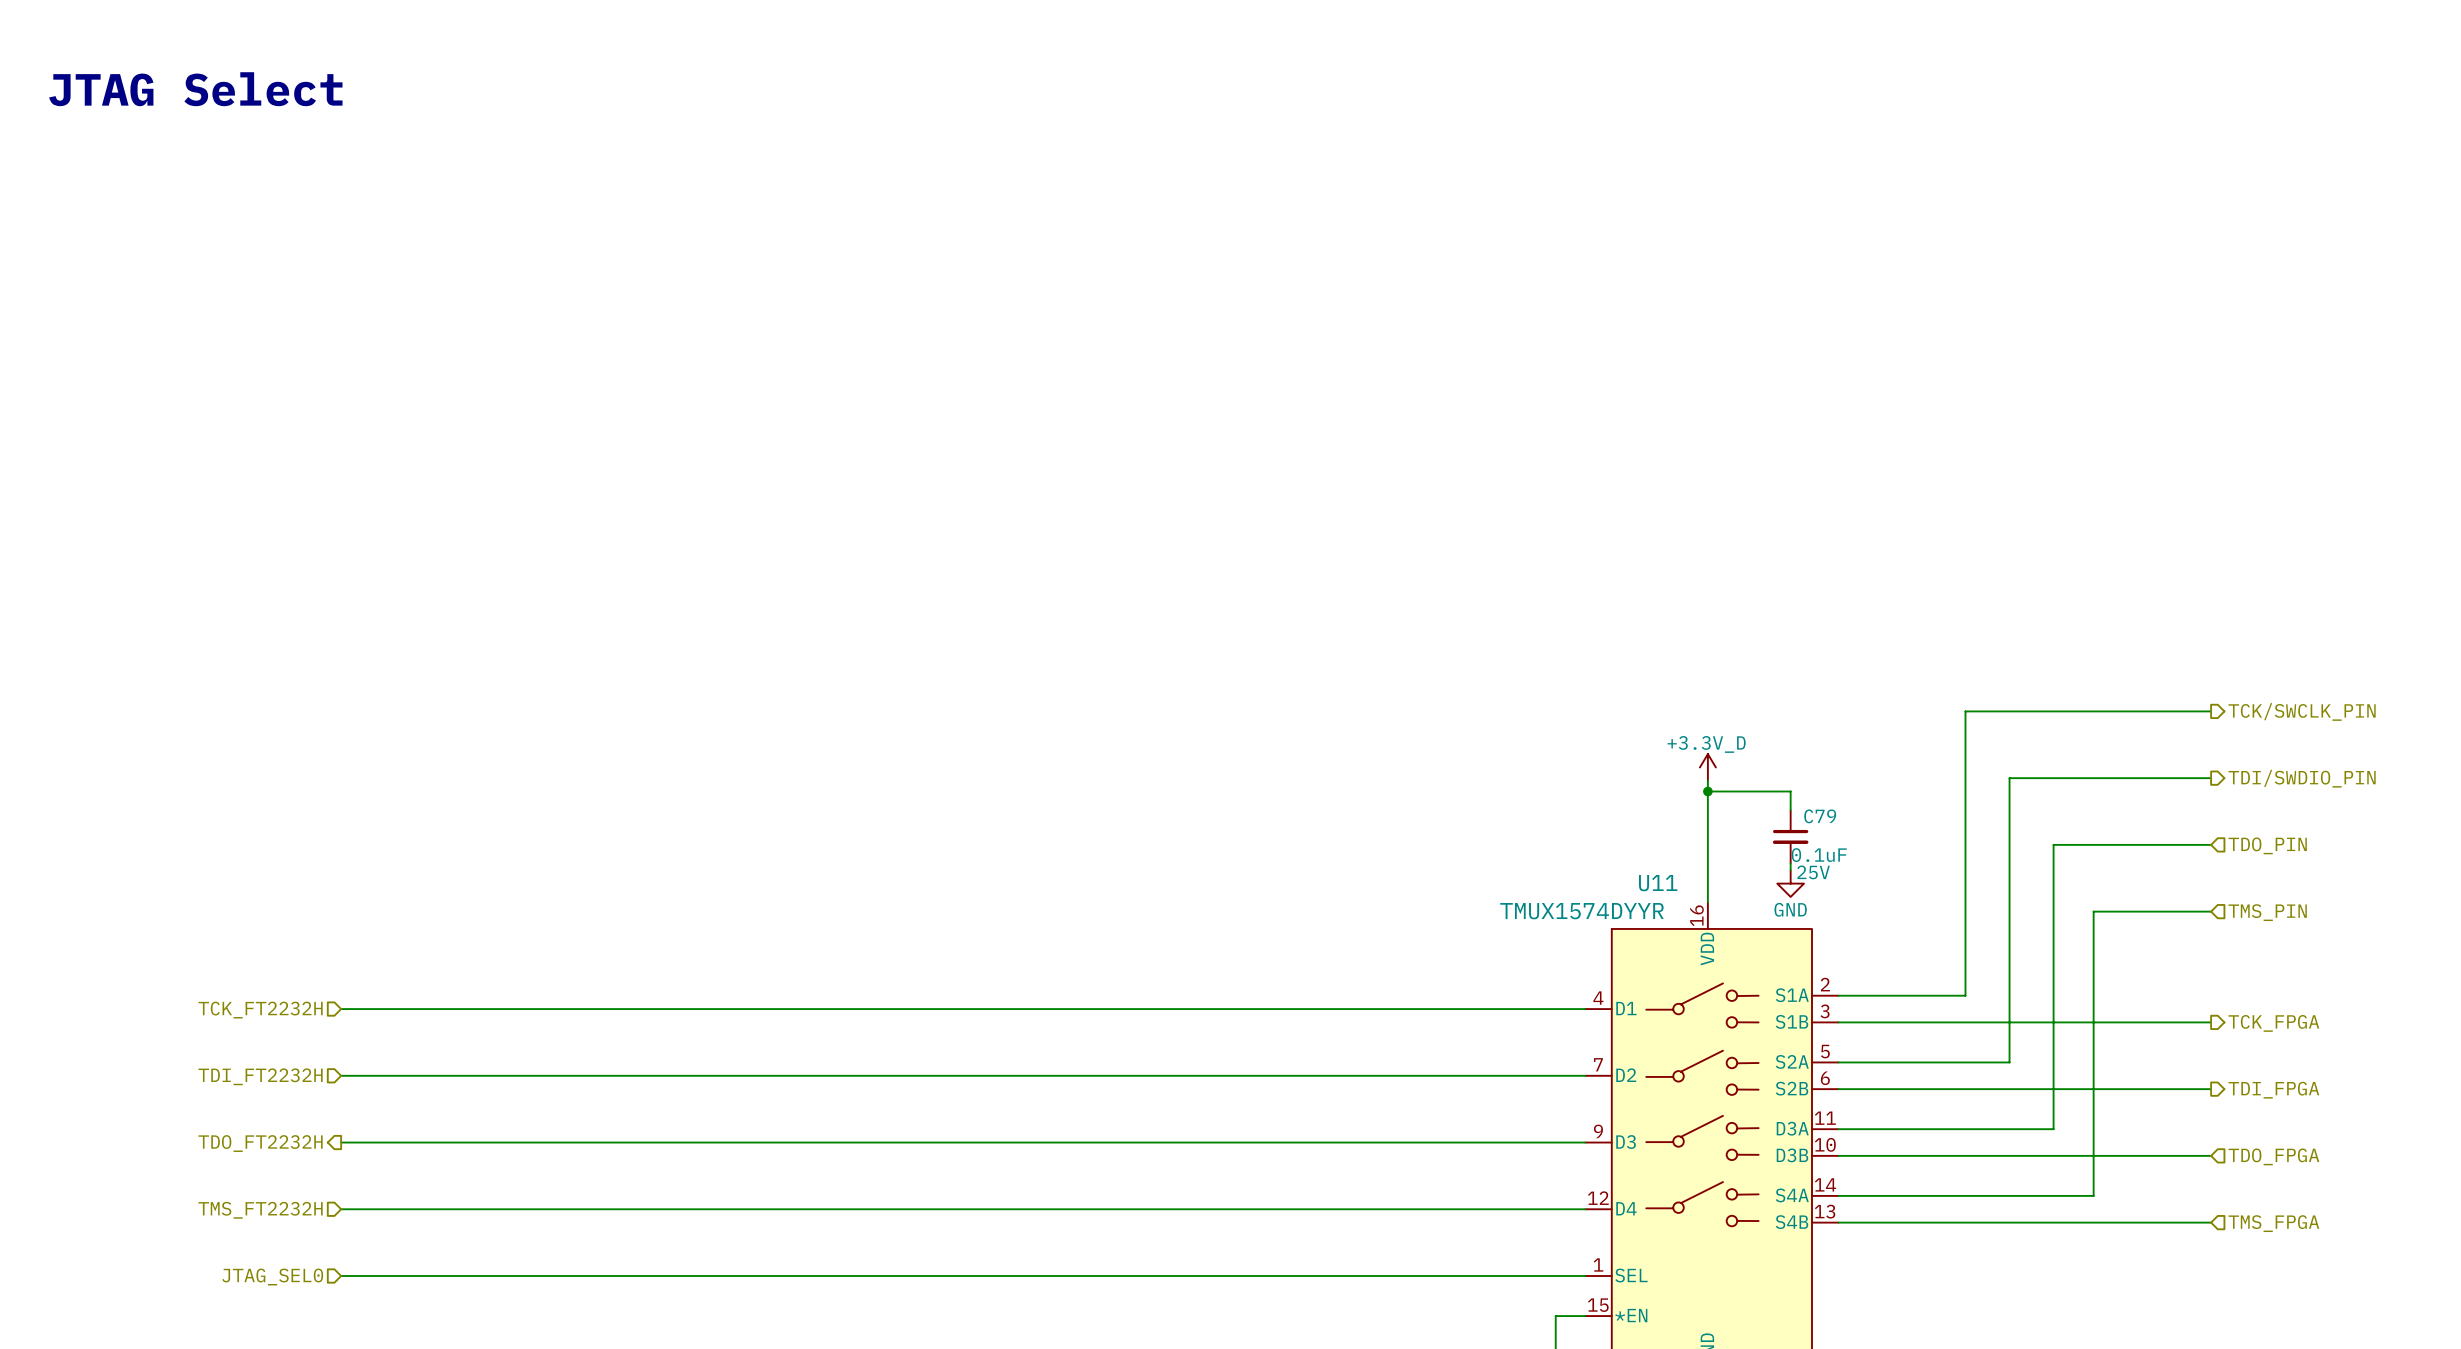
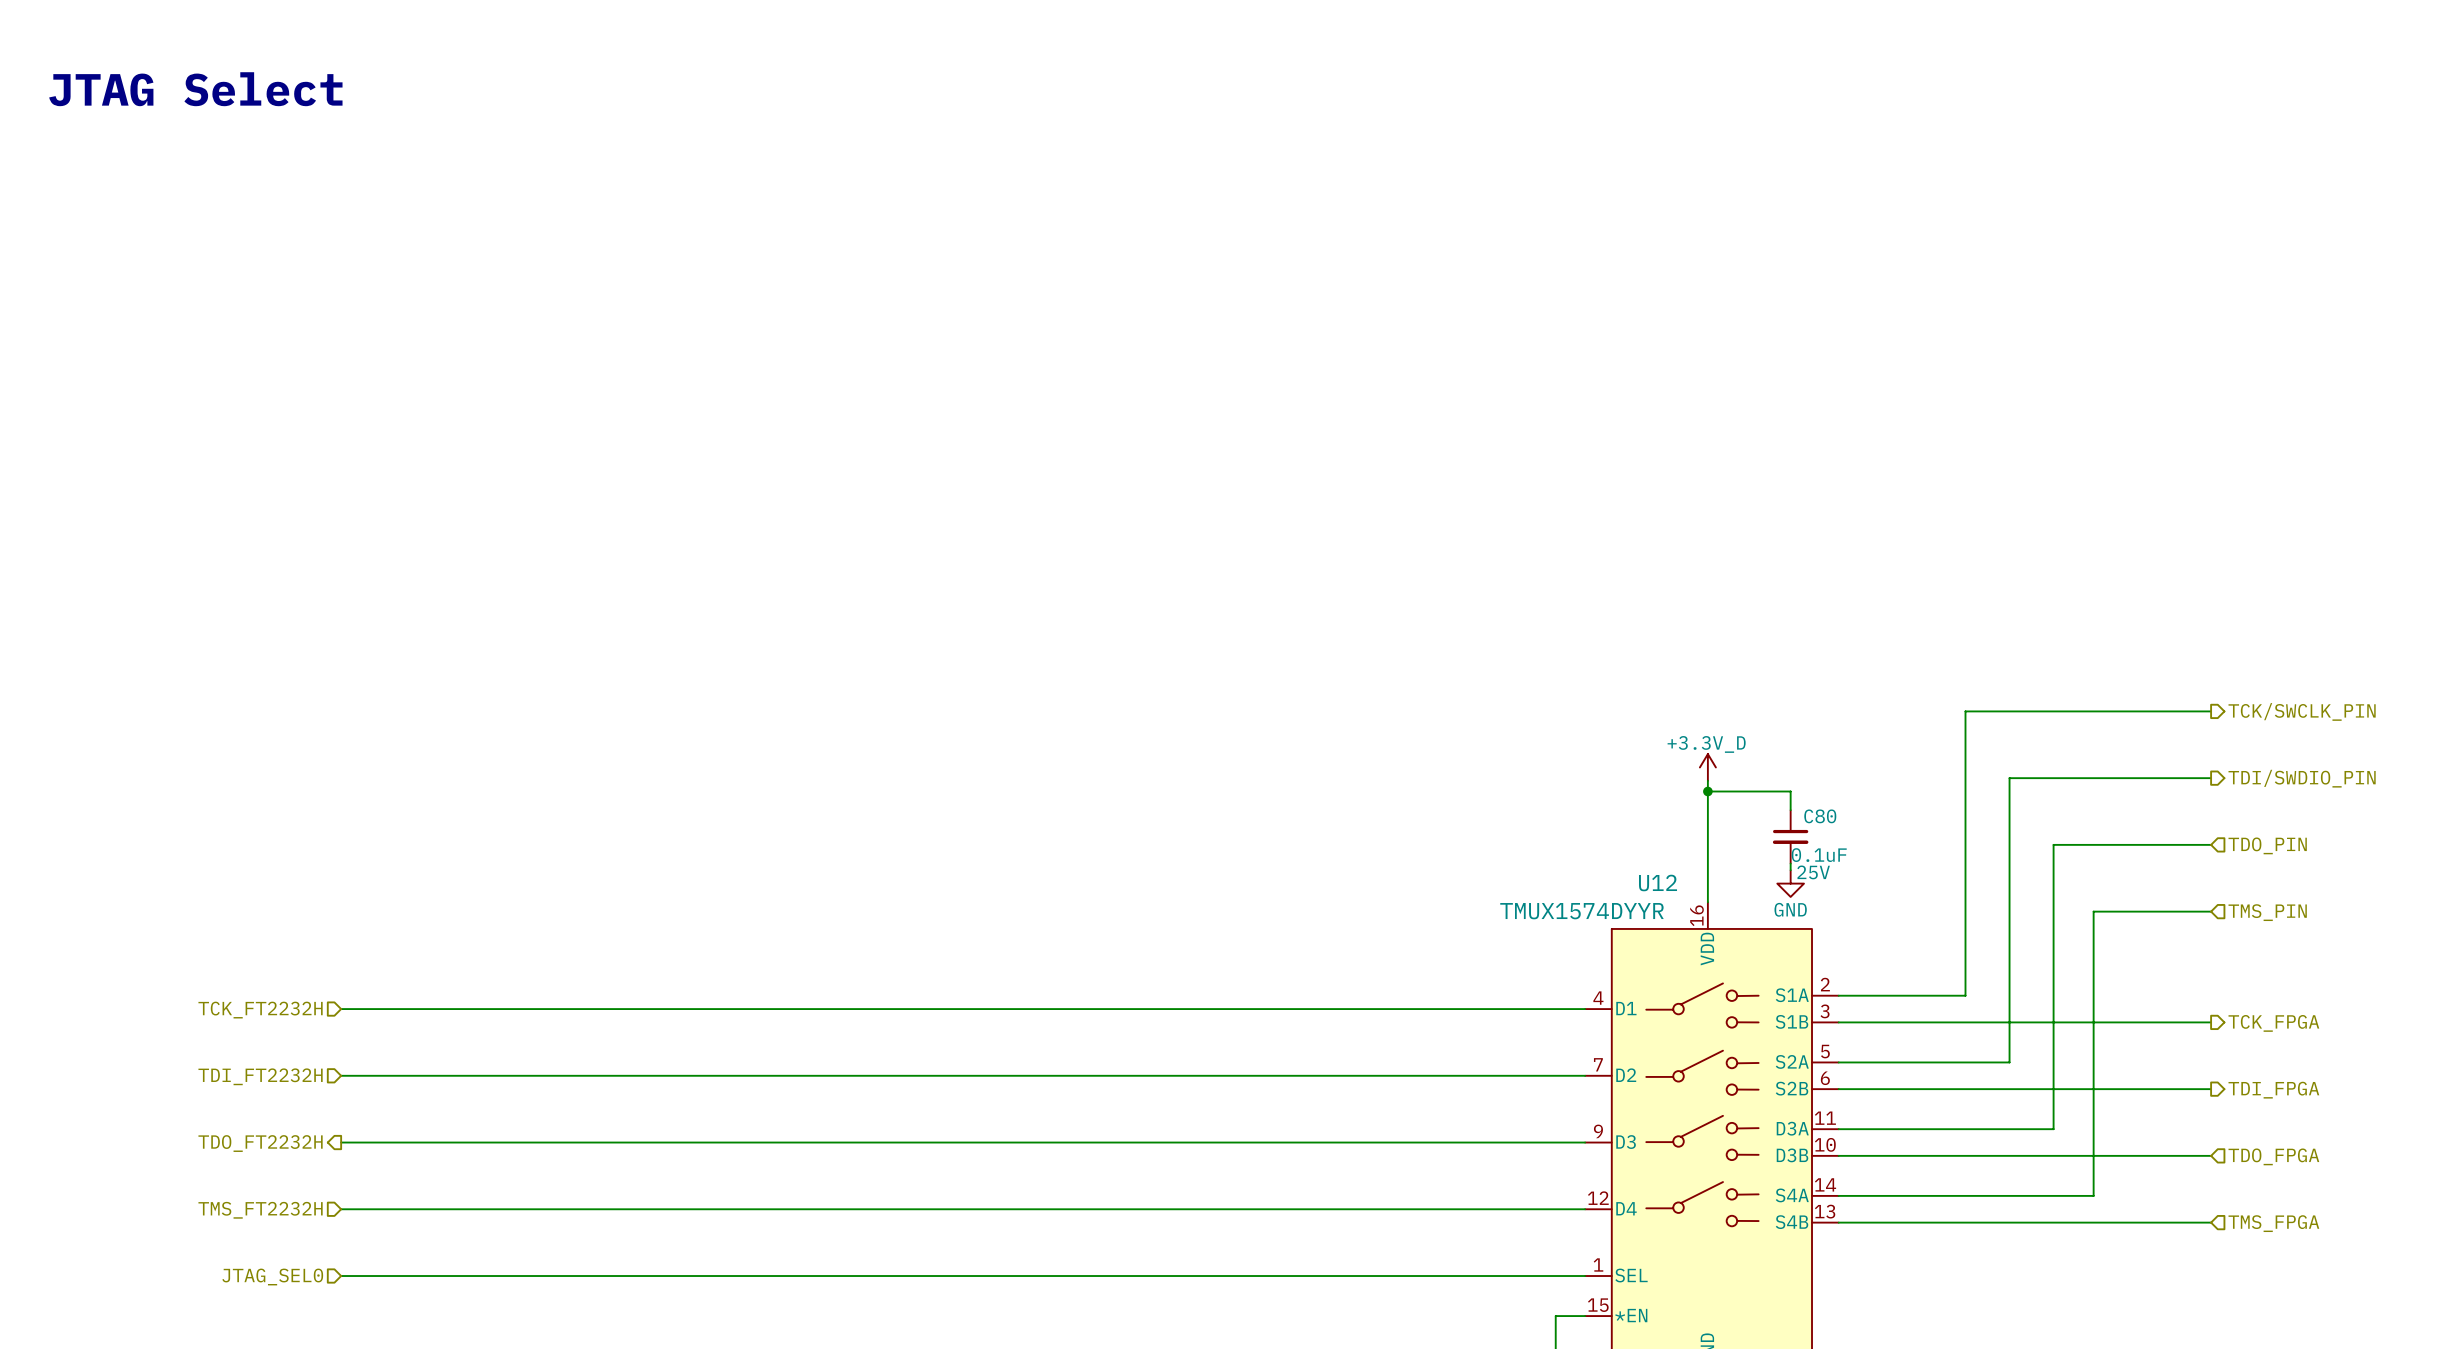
C79 name: C79 (1820, 816) -> C80 (1820, 816)
U11 name: U11 (1658, 883) -> U12 (1658, 883)

